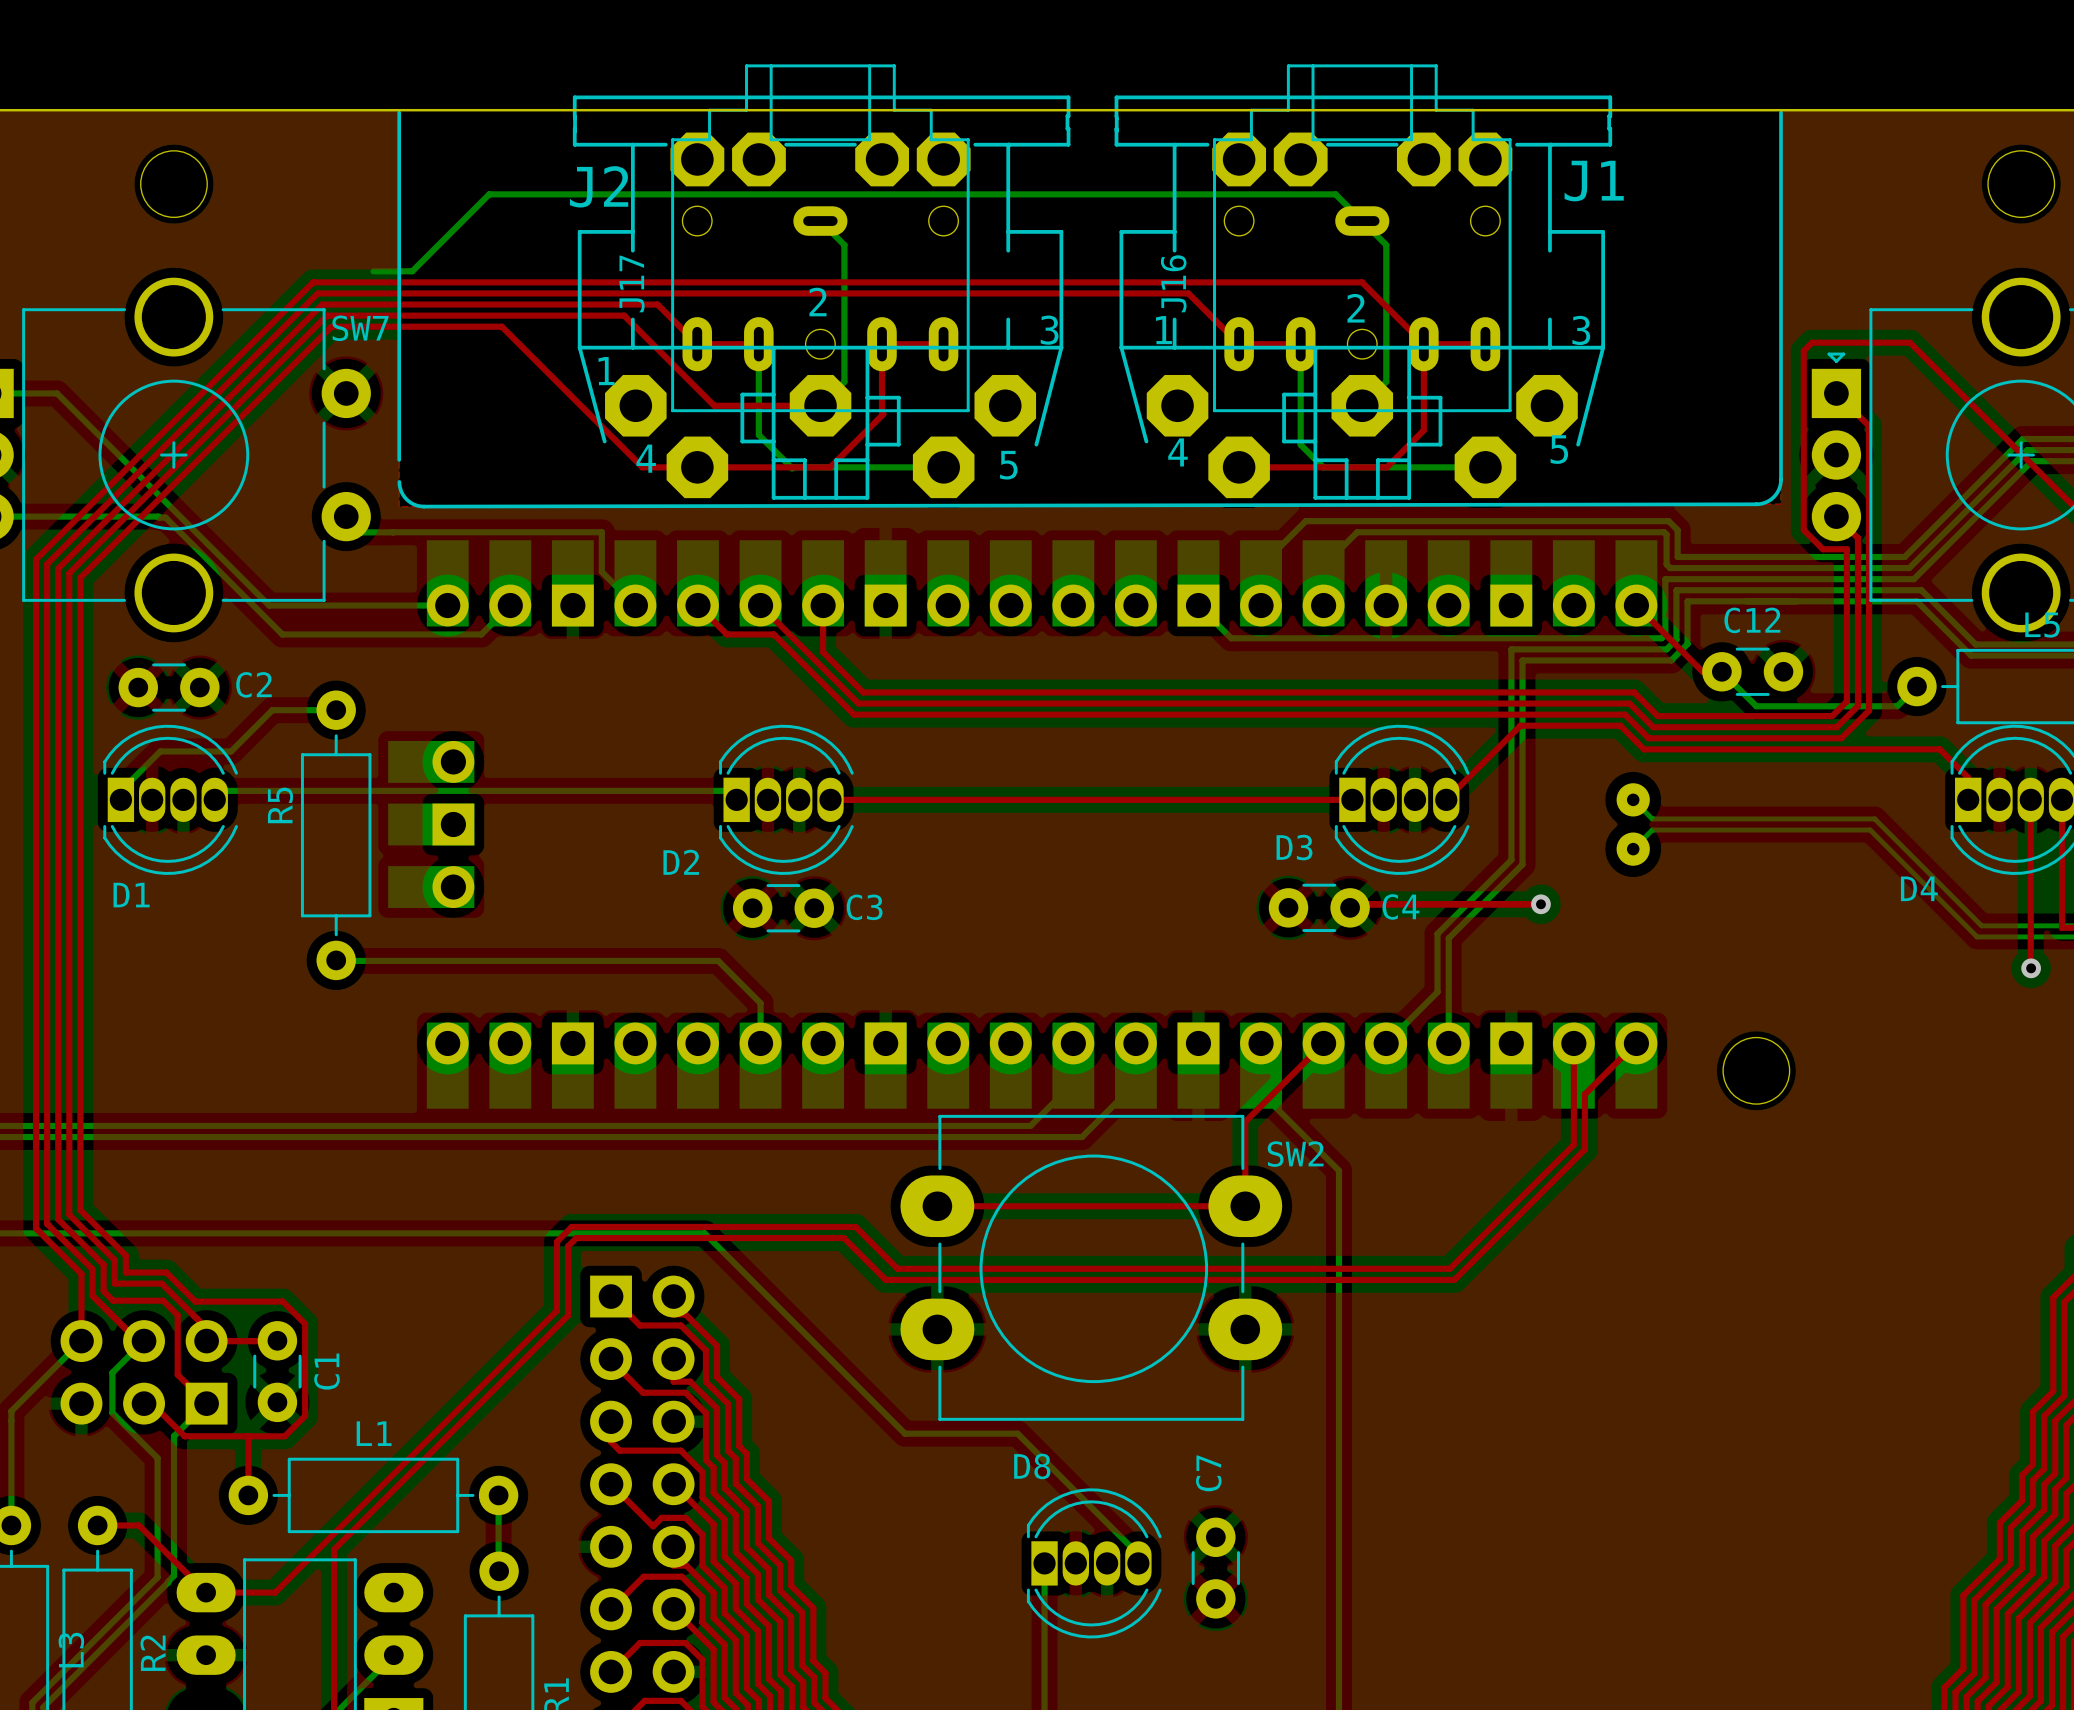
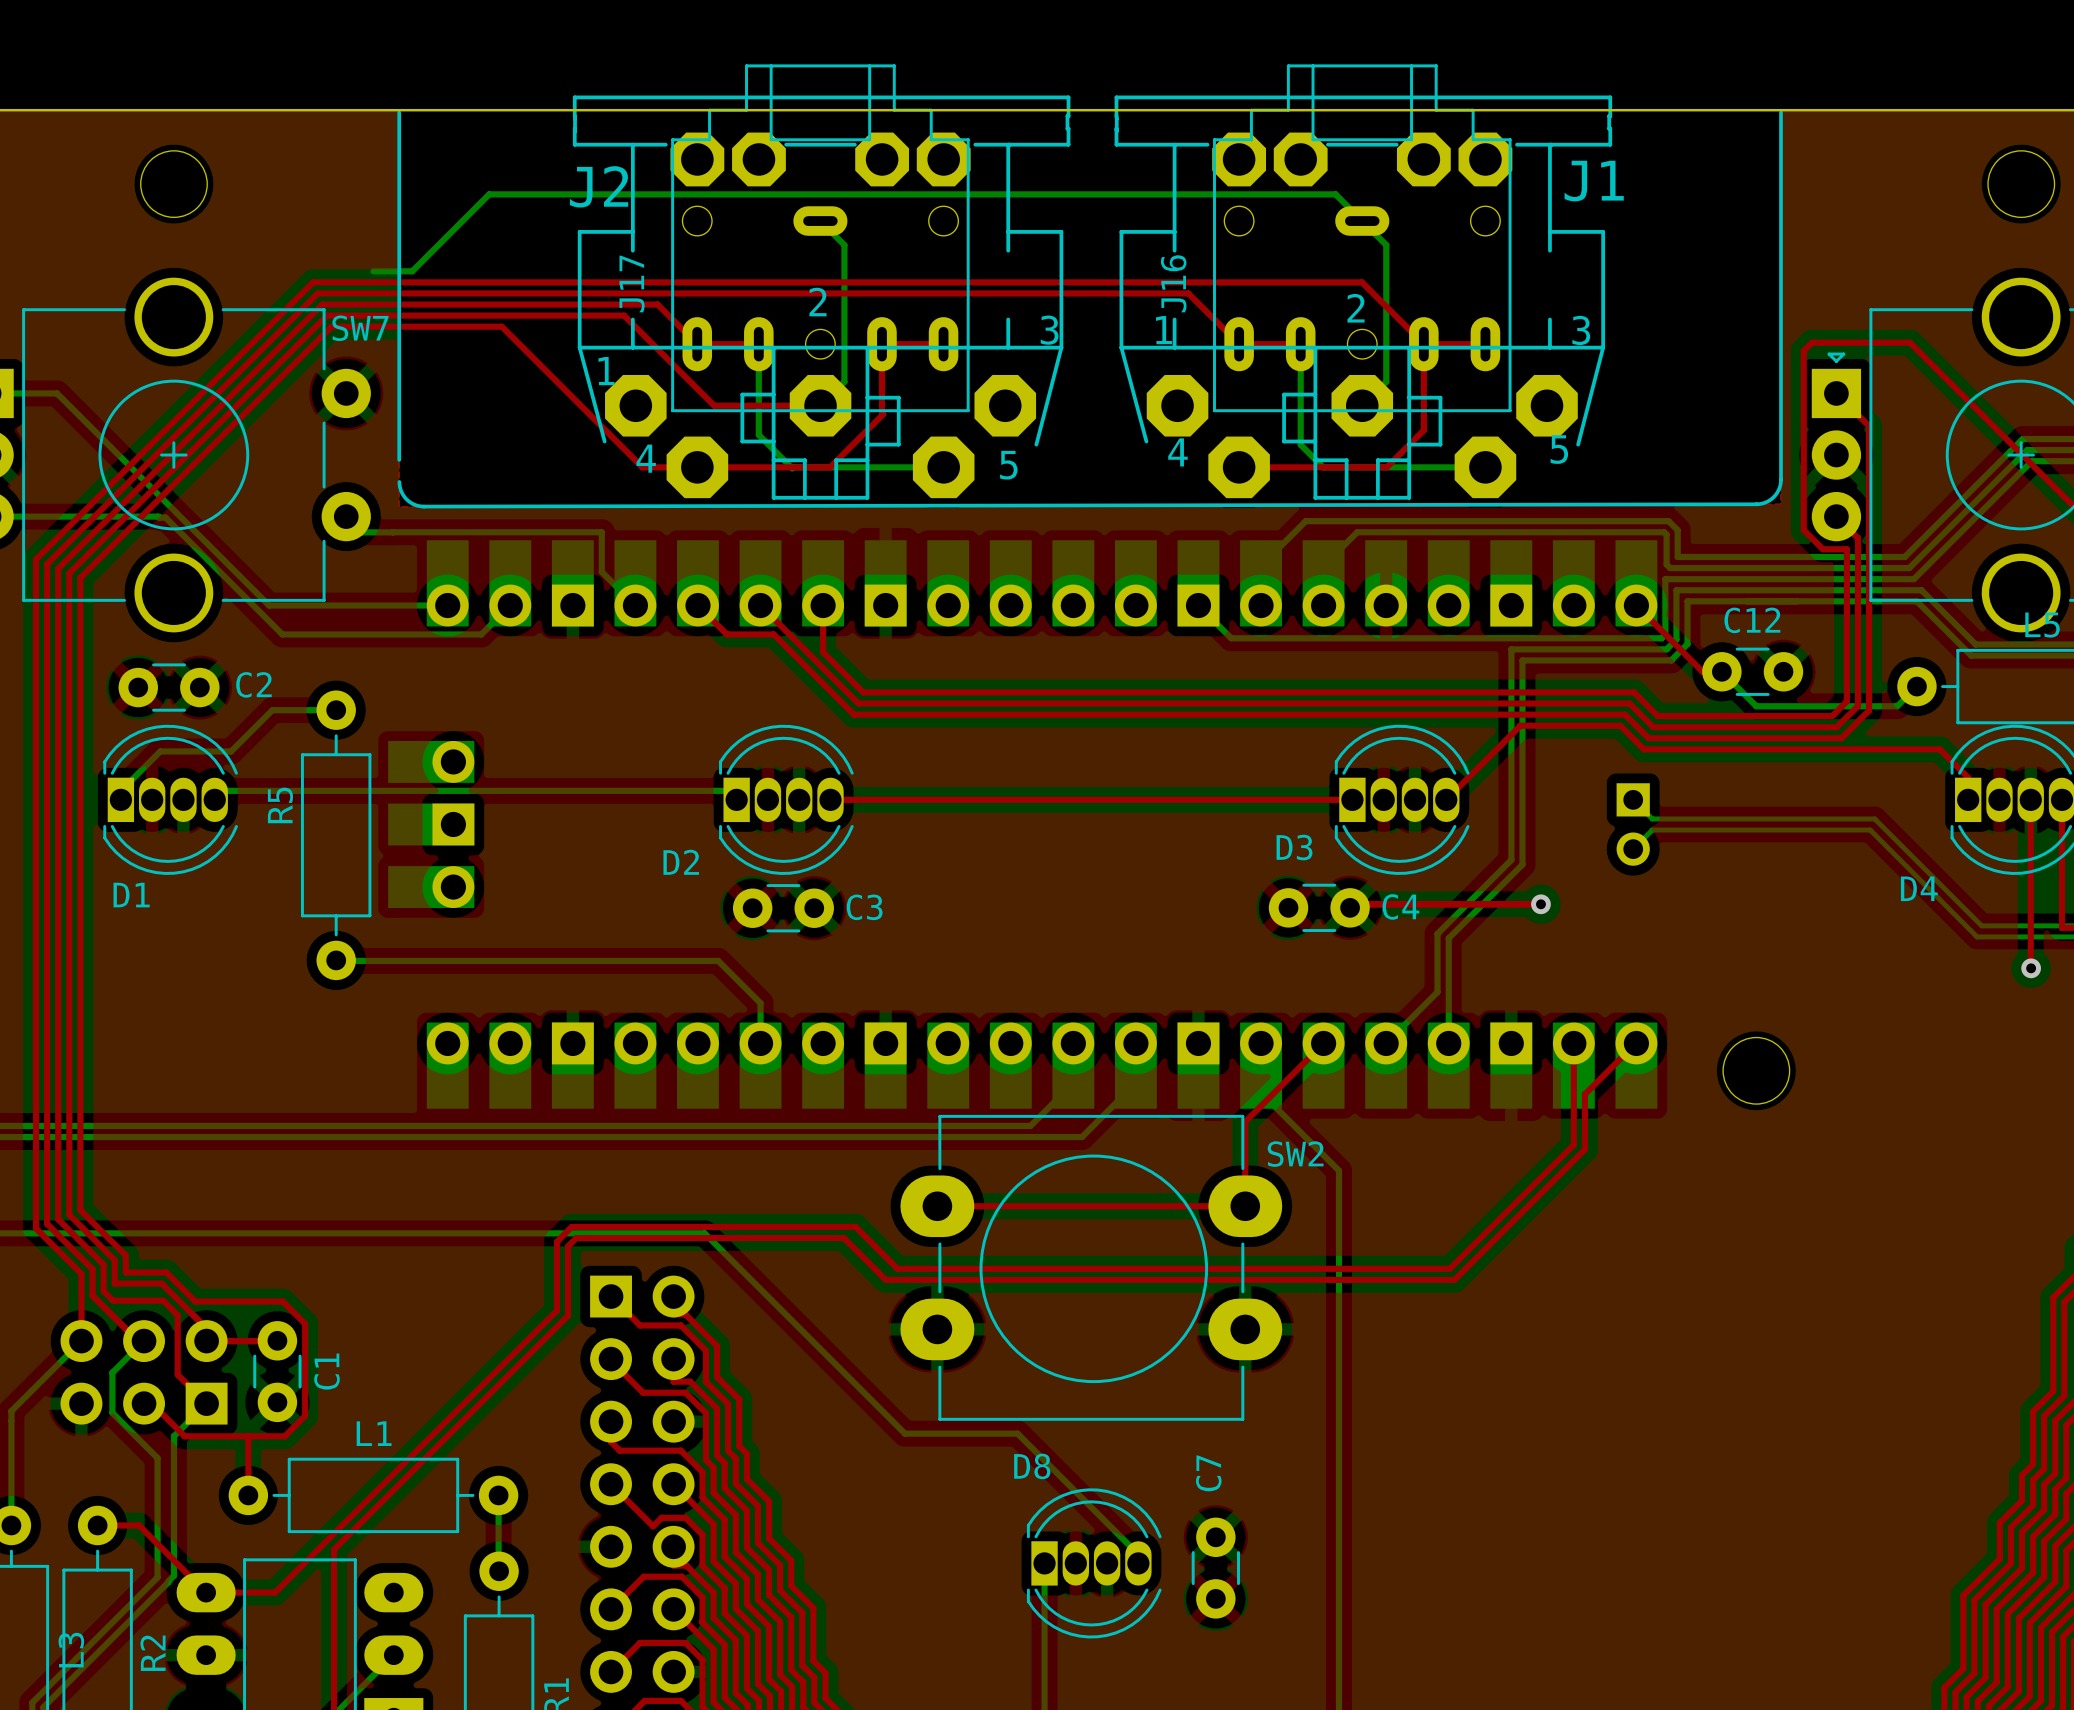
part footprint: [1616, 783, 1650, 866] -> [1616, 783, 1650, 866]

